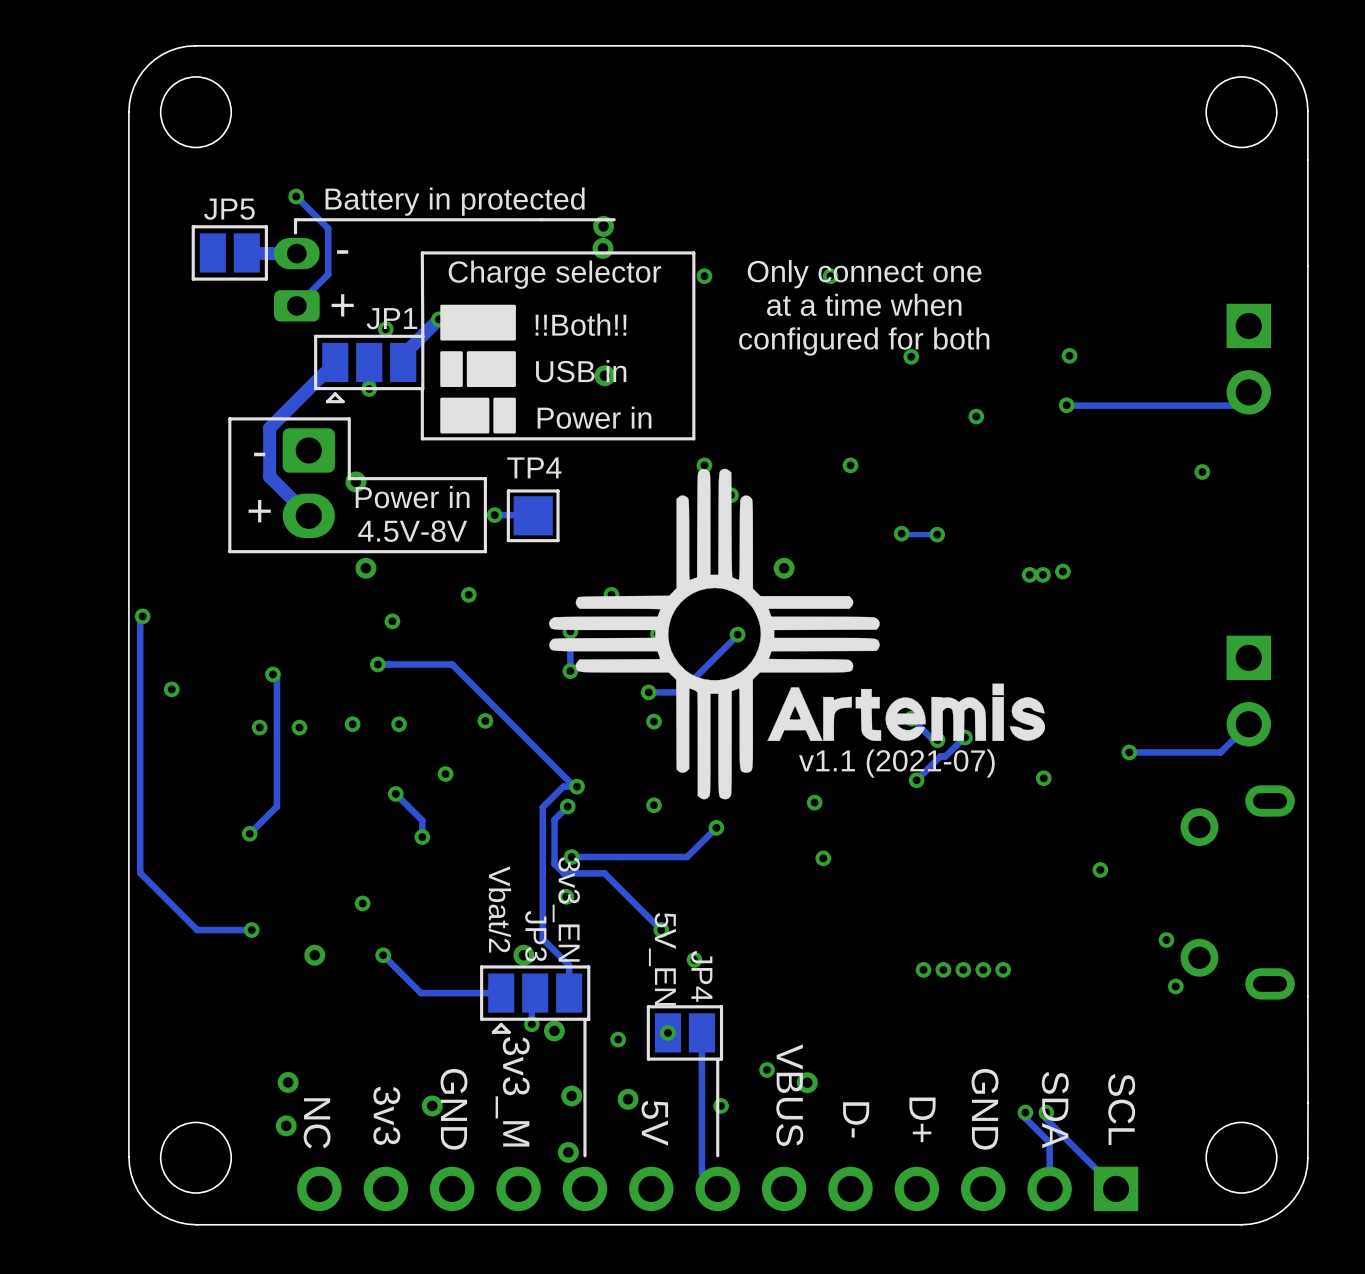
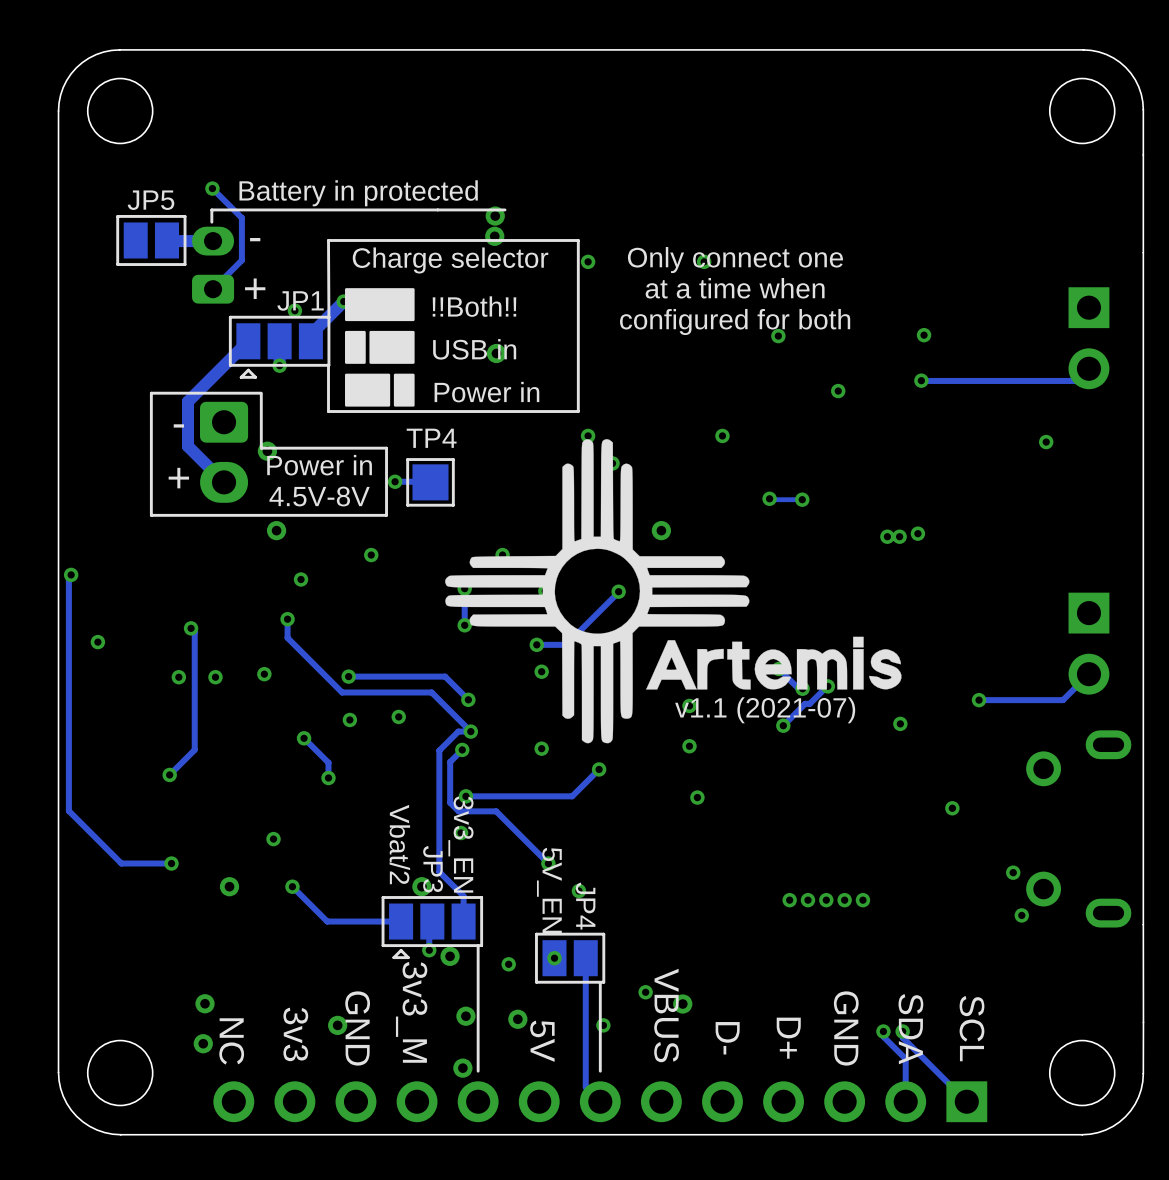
track: (377, 664) (452, 664) (574, 786) -> (287, 619) (287, 637) (342, 692) (431, 692) (470, 731)
via: (485, 720) -> none
via: (399, 724) -> none
track: none -> (348, 676) (445, 676) (468, 699)
via: none -> (348, 676)
via: none -> (468, 699)
via: none -> (689, 705)
via: none -> (398, 716)

